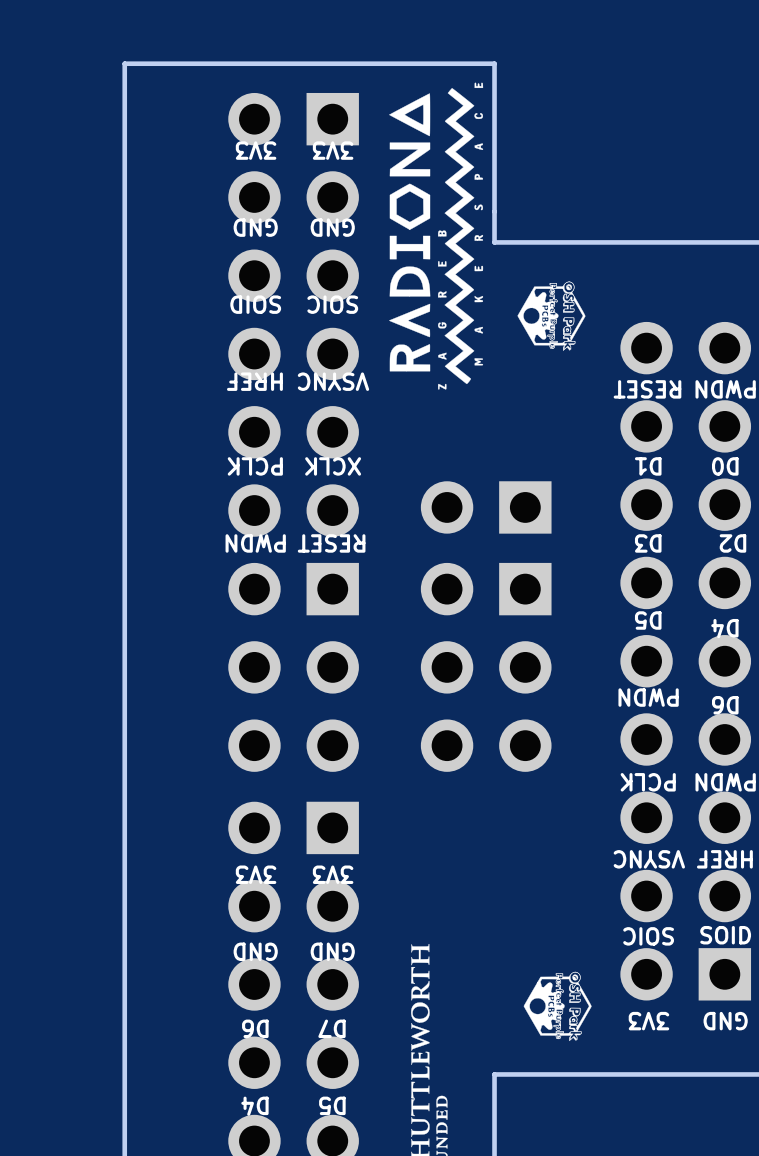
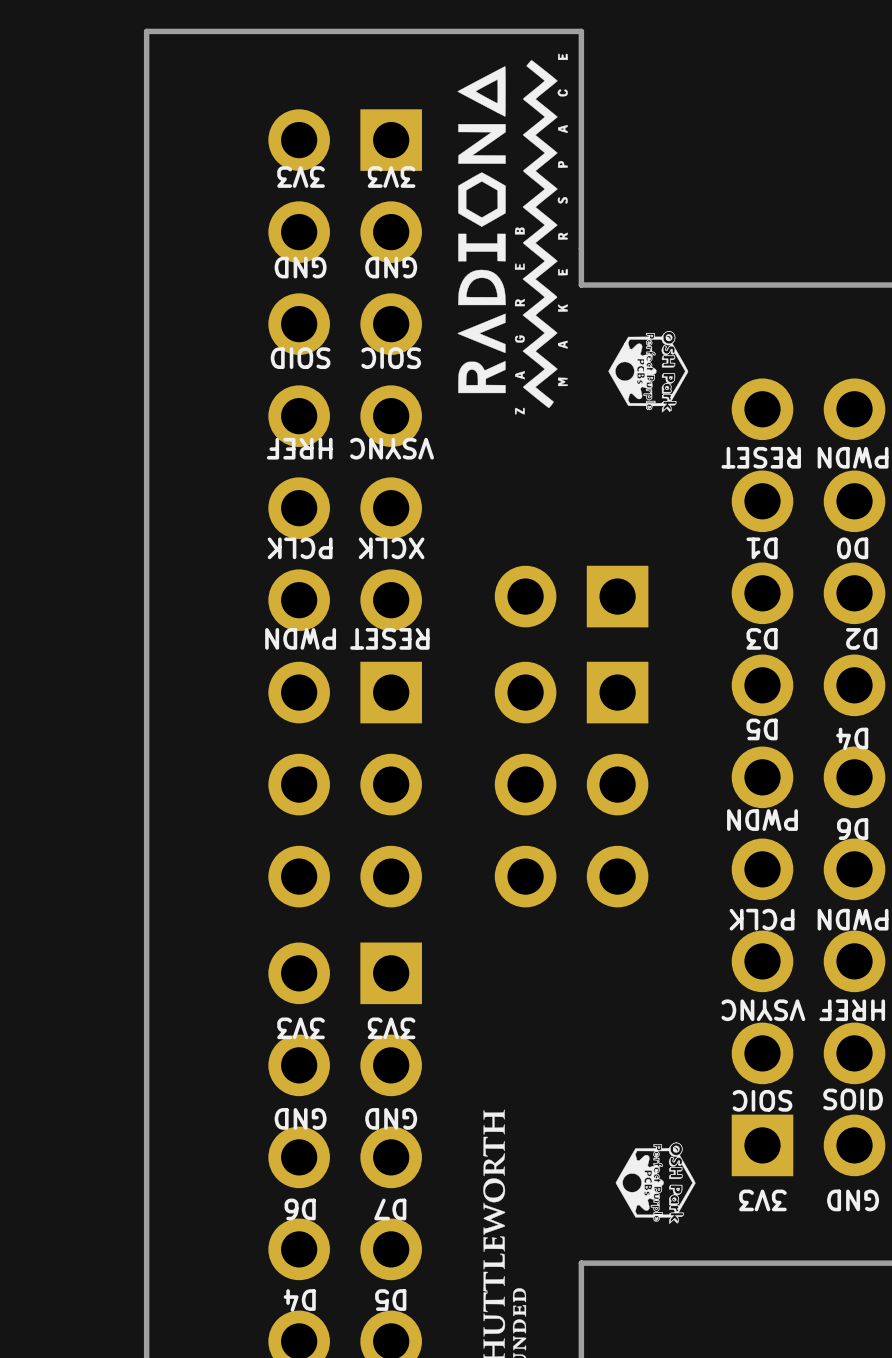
board edge: (494, 63) (124, 63) -> (581, 74) (581, 31) (146, 31) (146, 74)
drawing position: (436, 236) -> (512, 234)
part footprint: [620, 321, 752, 1001] -> [731, 378, 886, 1177]

